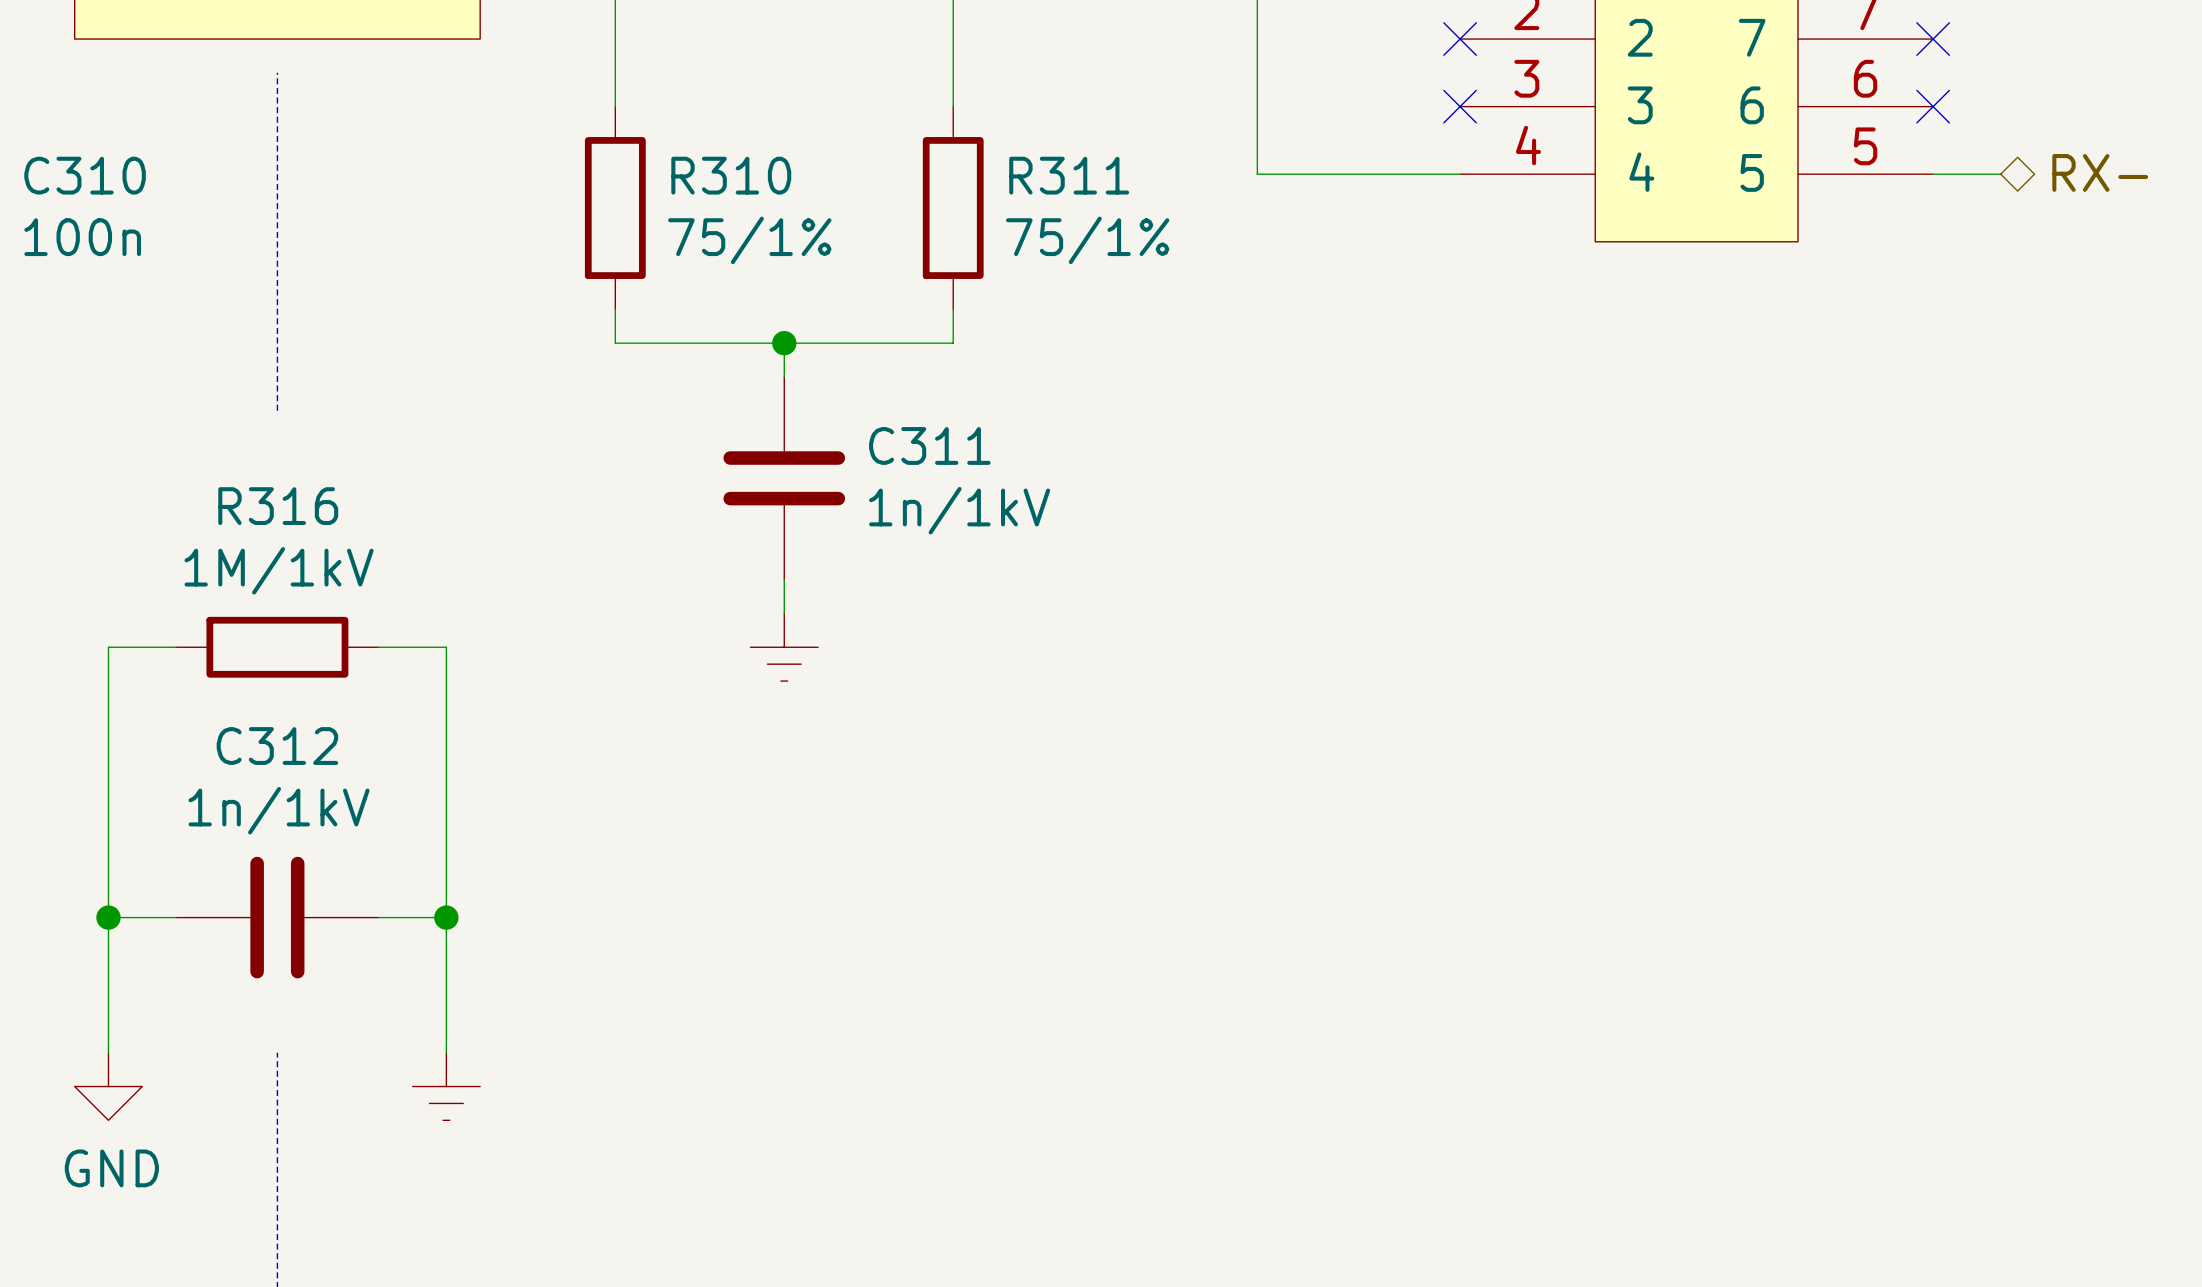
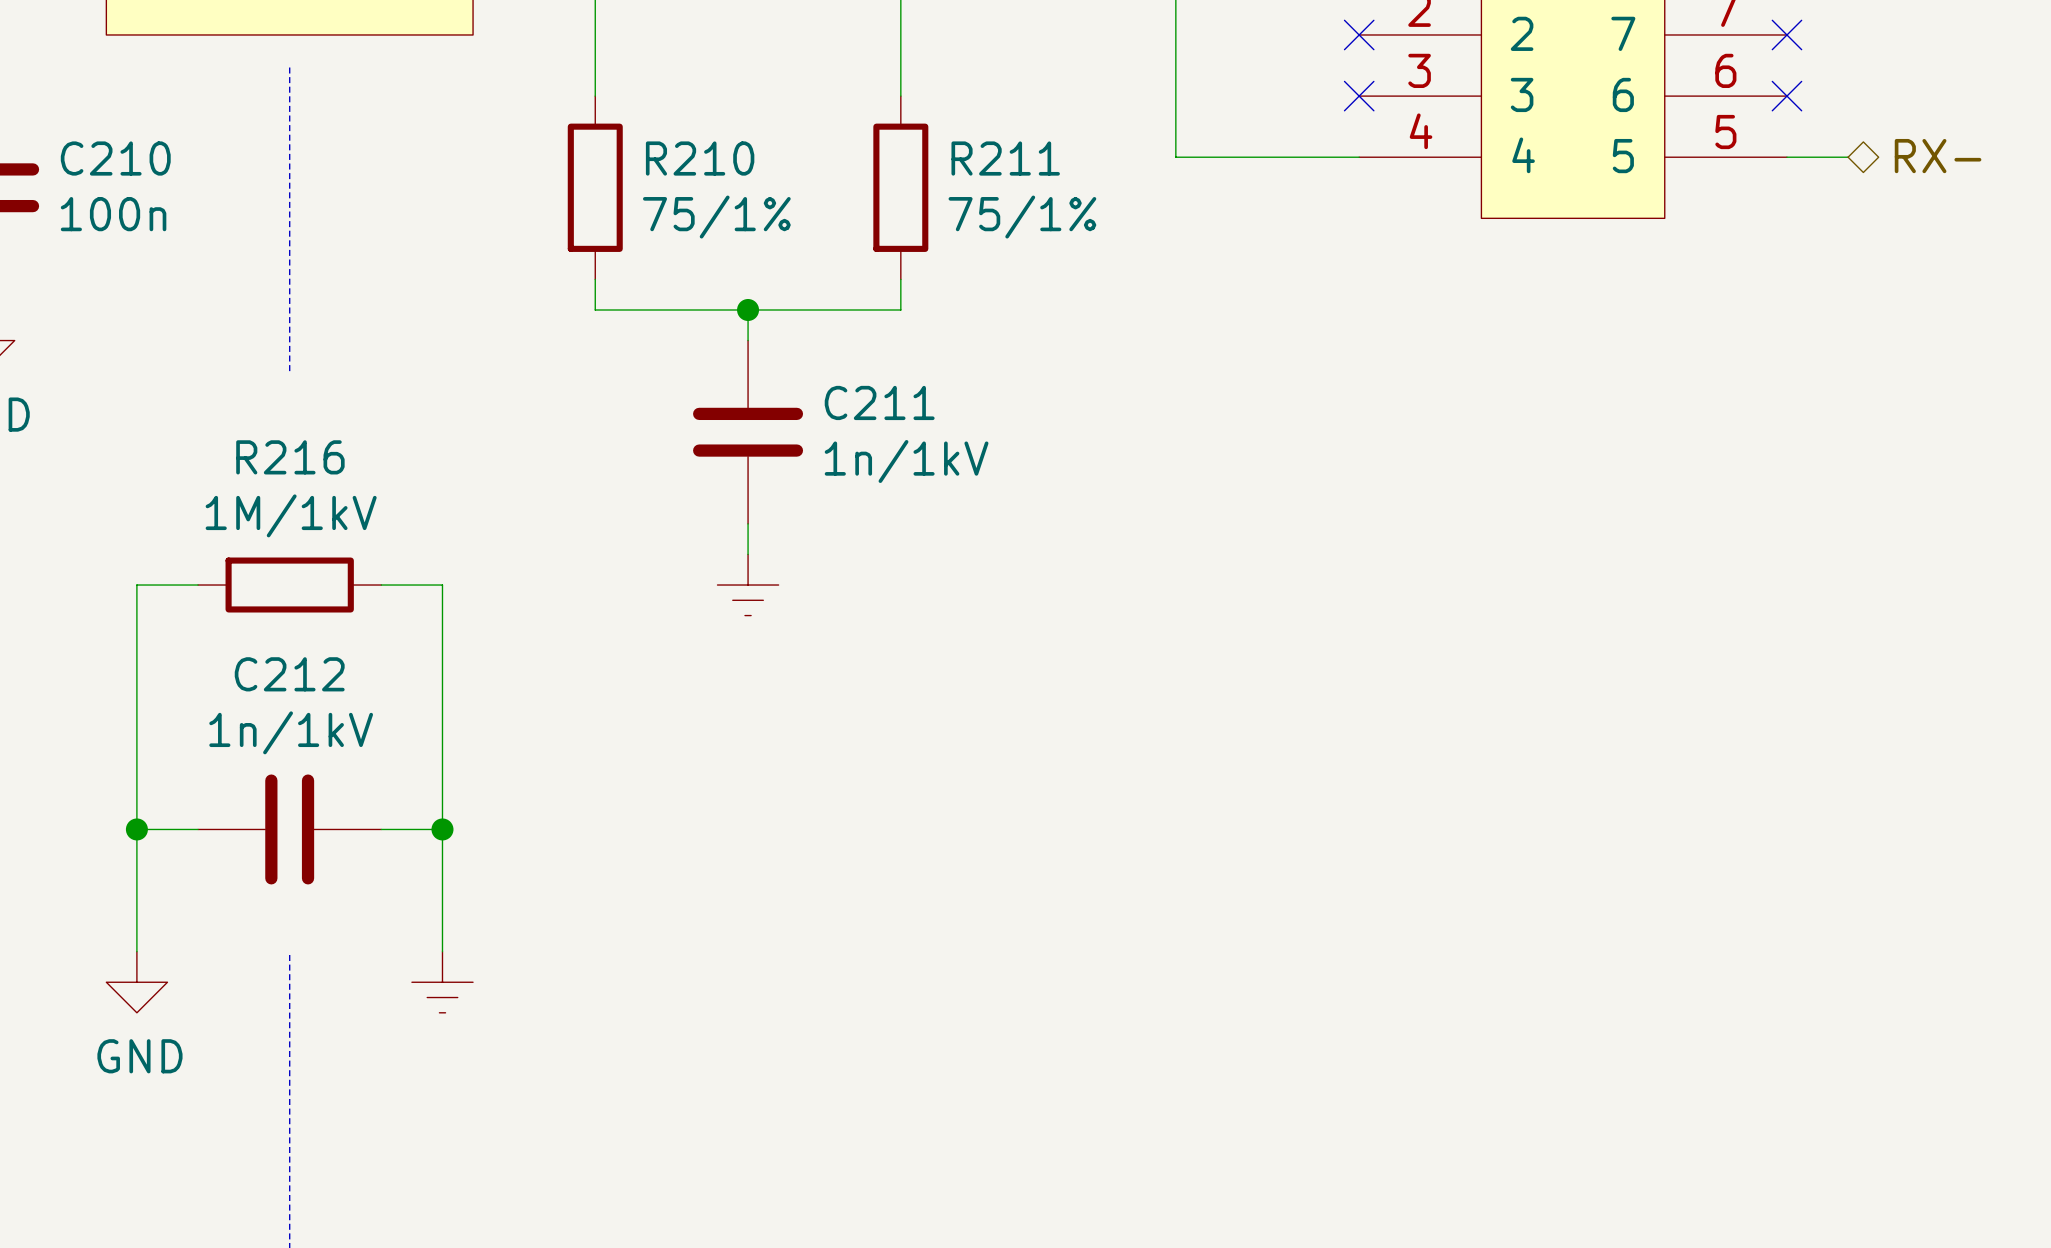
C310 name: C310 (85, 175) -> C210 (115, 158)
R310 name: R310 (731, 175) -> R210 (700, 158)
R311 name: R311 (1069, 175) -> R211 (1005, 158)
C311 name: C311 (929, 445) -> C211 (879, 402)
R316 name: R316 (278, 506) -> R216 (290, 457)
C312 name: C312 (277, 746) -> C212 (289, 674)

